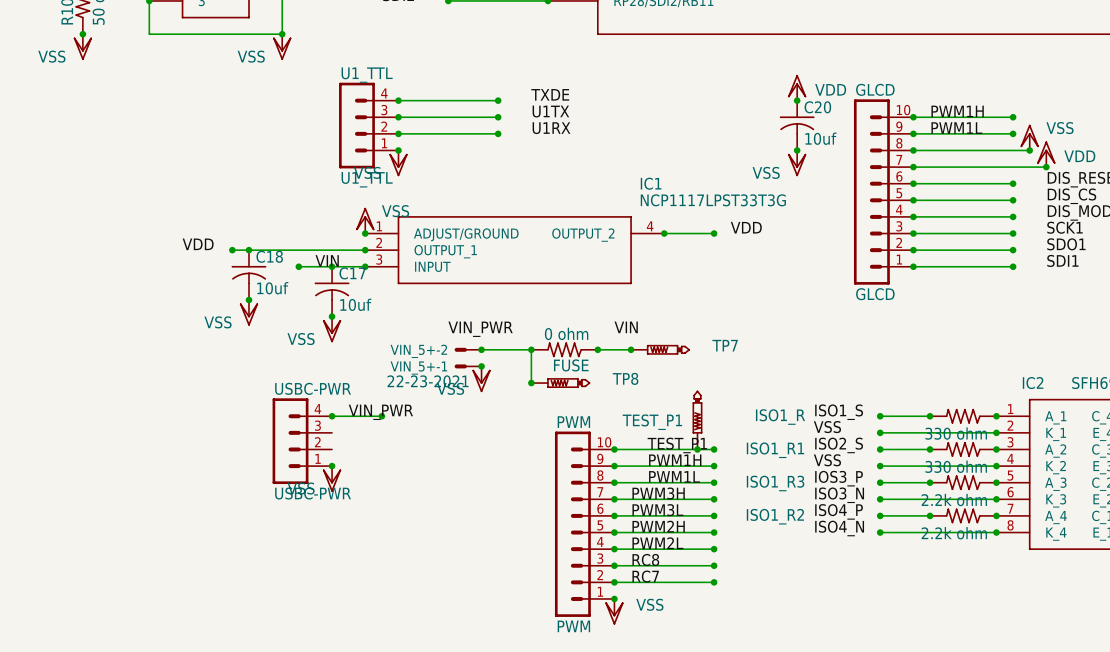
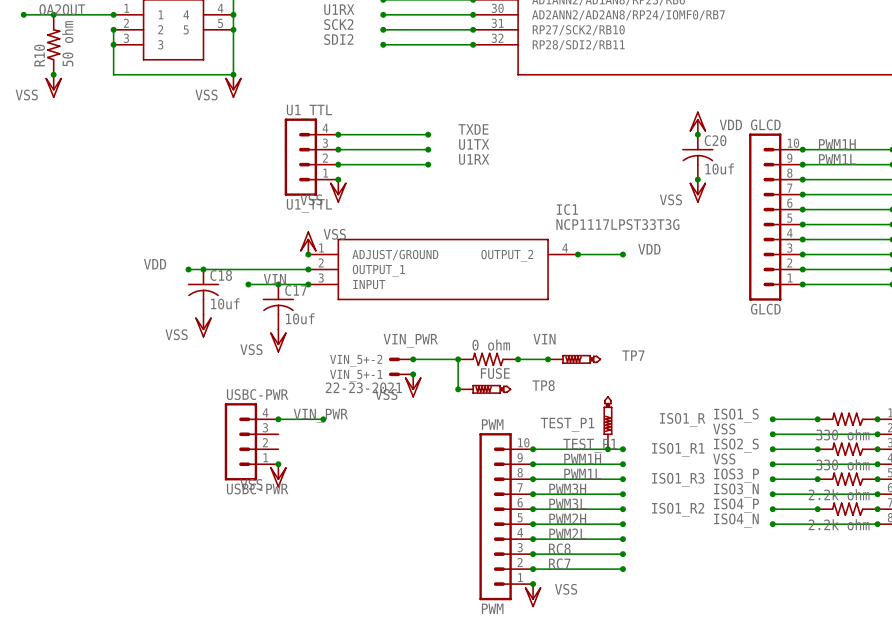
junction: (248, 299) -> none
junction: (332, 316) -> none

